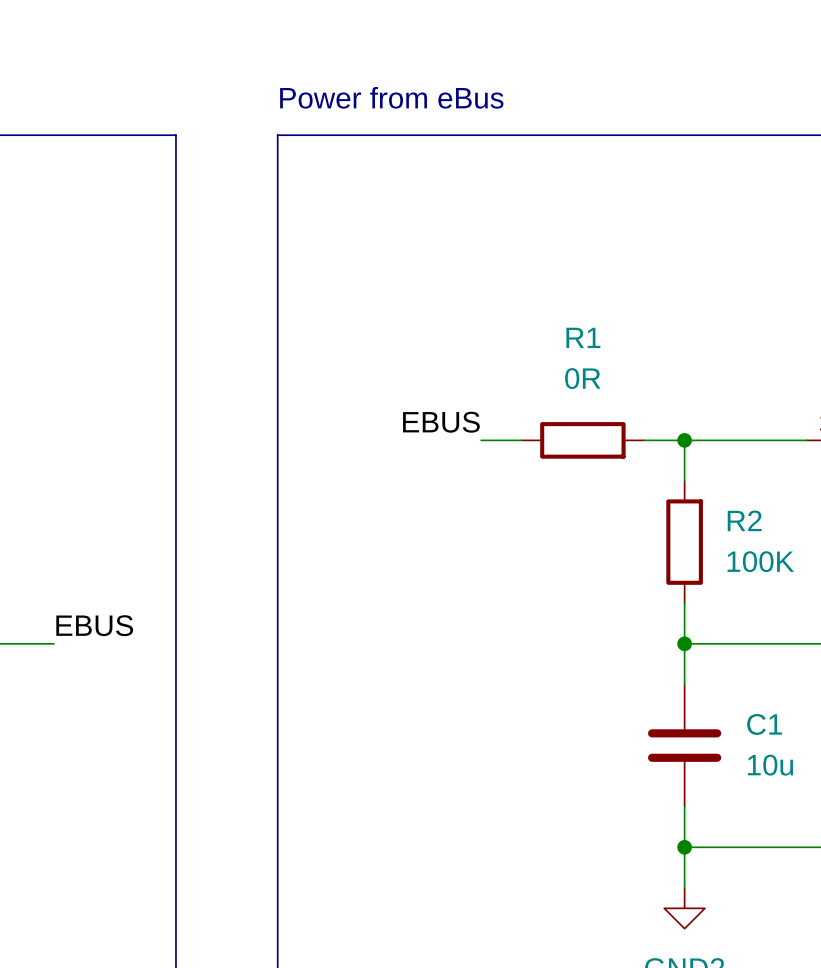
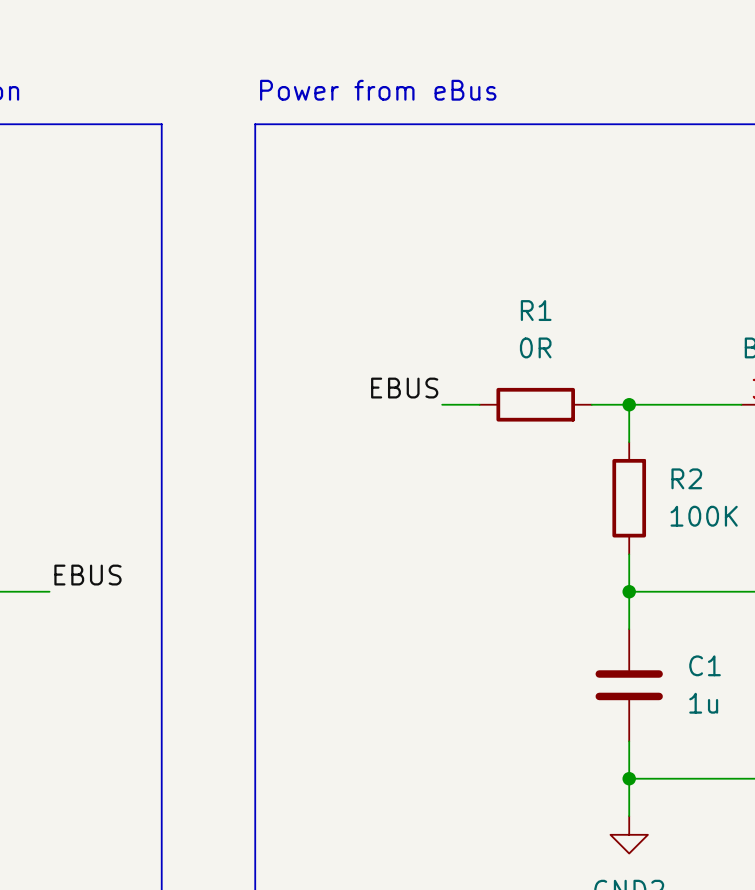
C1 value: 10u (770, 765) -> 1u (703, 703)

